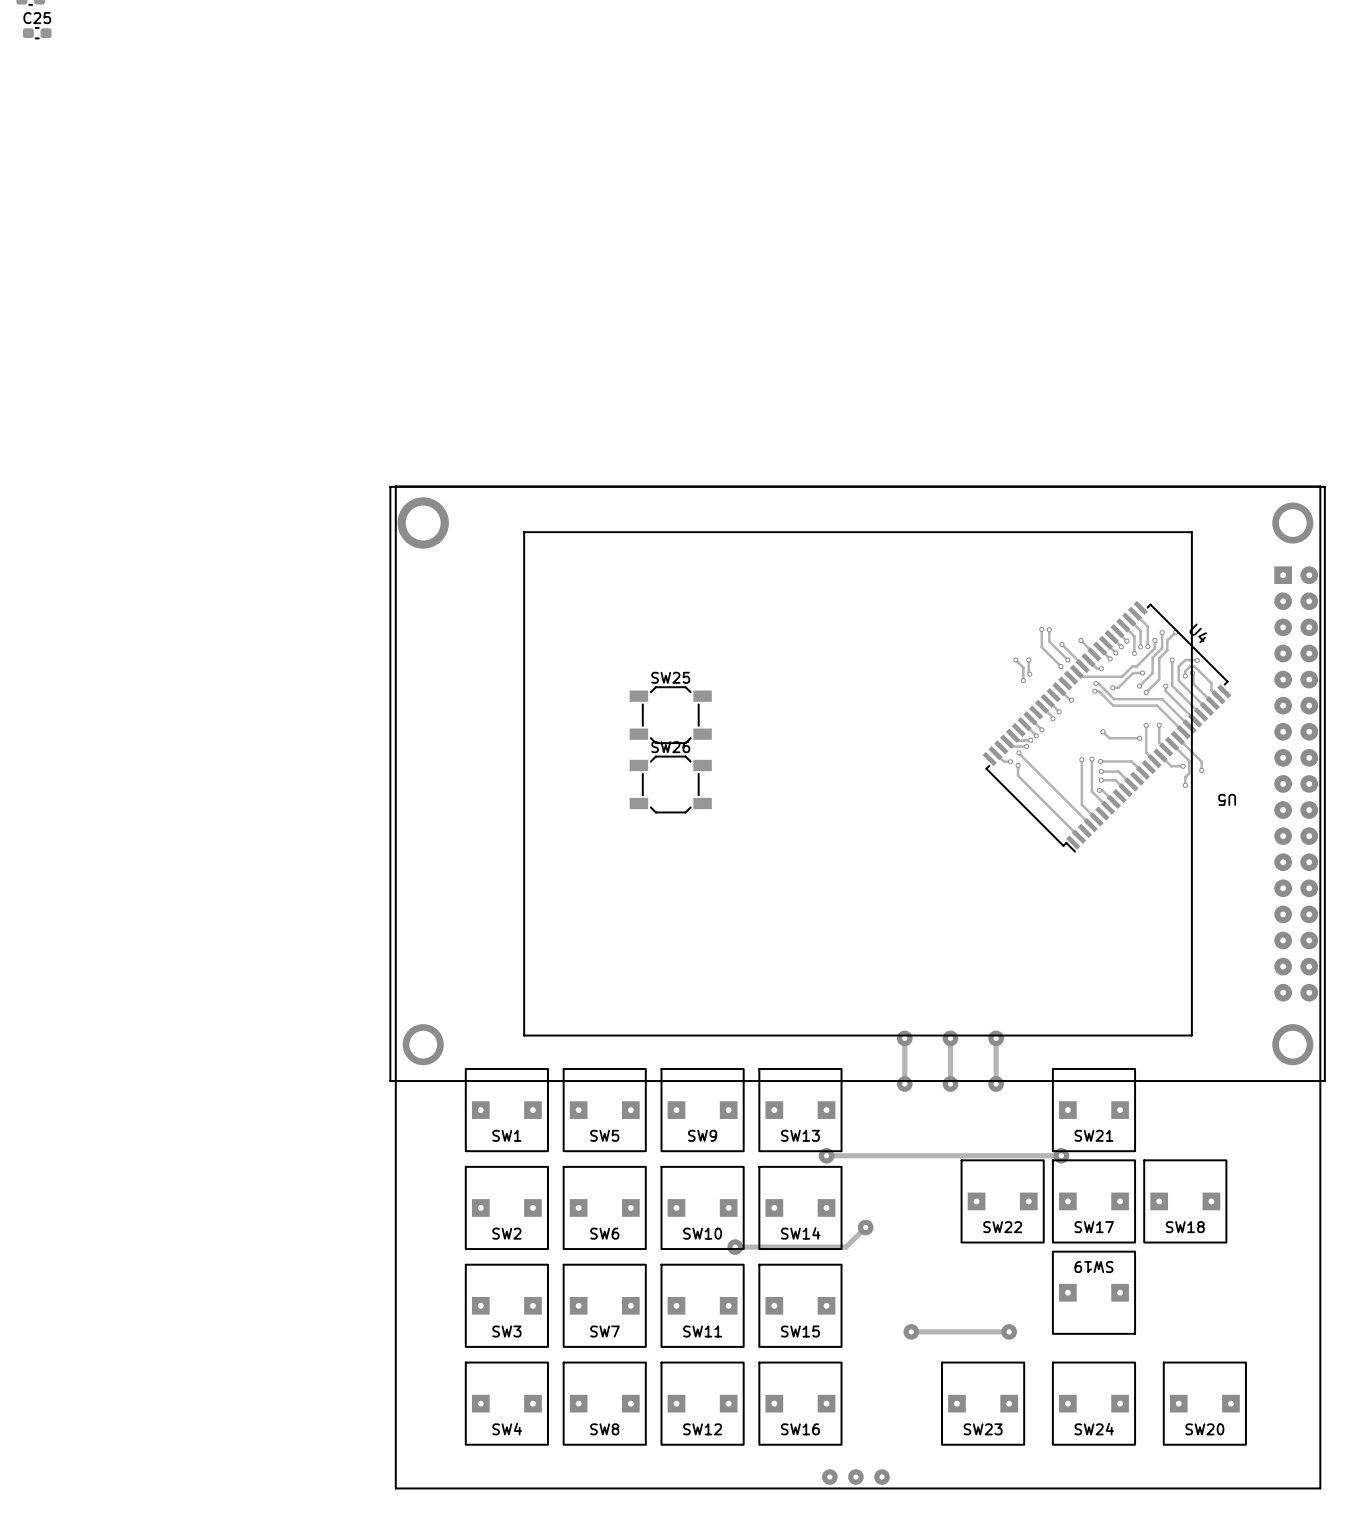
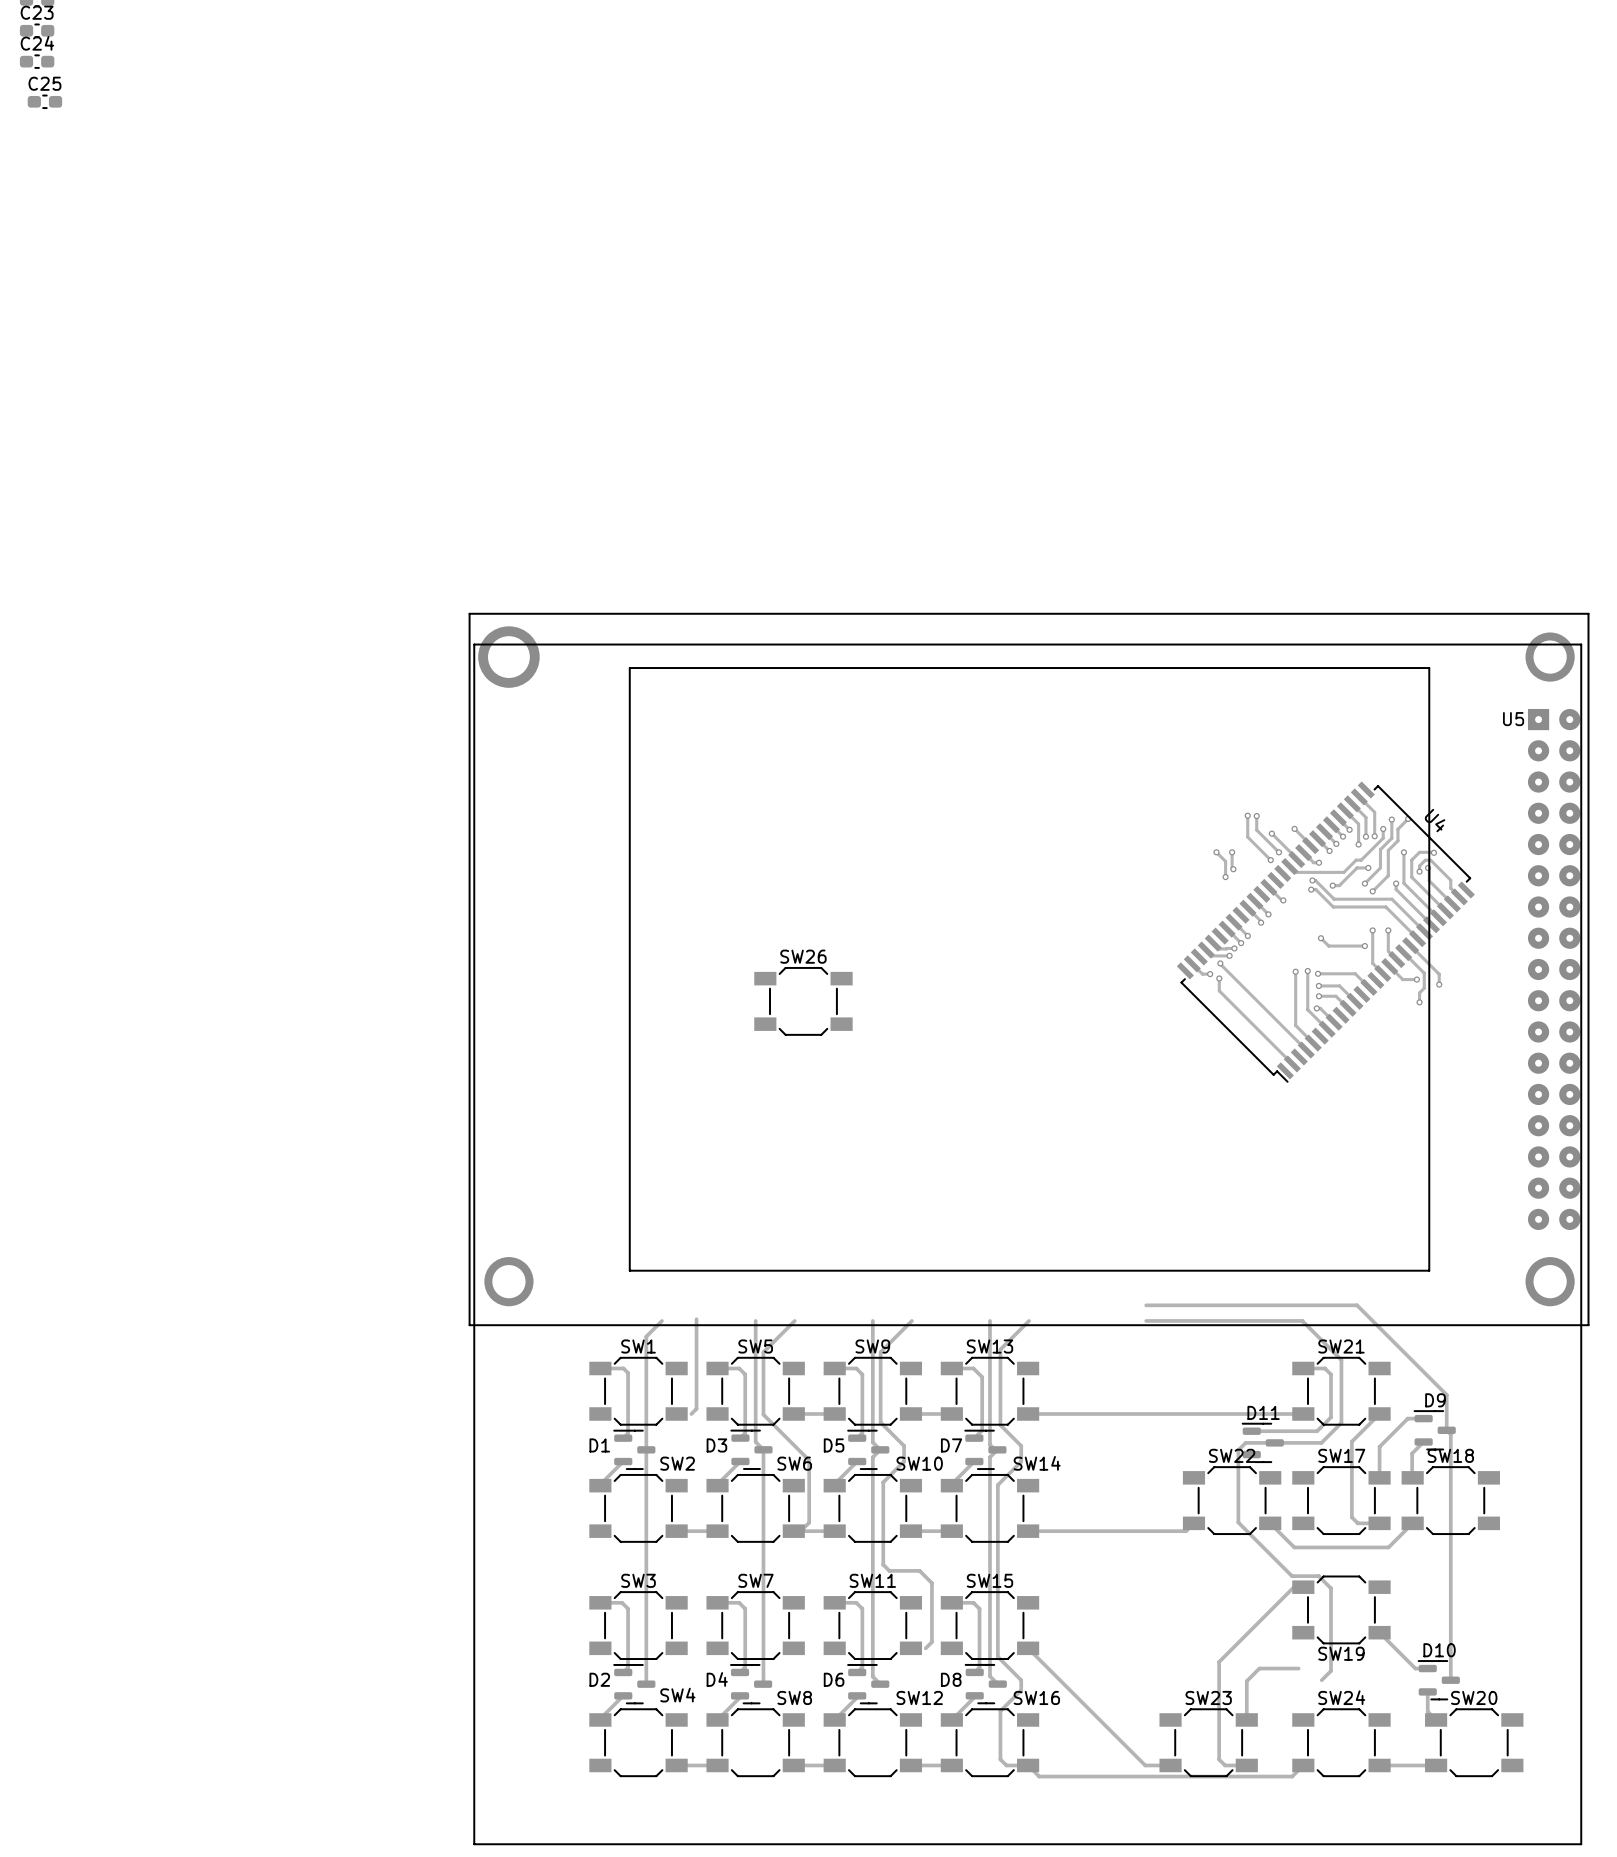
SW25: (670, 715) -> none
U5 position: (857, 783) -> (1029, 969)
U5 name rotation: 0° (1227, 799) -> 180° (1513, 719)
U5 name position: U5 (1227, 799) -> U5 (1513, 719)
track: (904, 1038) (904, 1084) -> none
via: (904, 1038) -> none
track: (950, 1038) (950, 1084) -> none
via: (950, 1038) -> none
track: none -> (1146, 1305) (1357, 1305) (1446, 1394) (1446, 1430) (1450, 1434) (1450, 1680)
track: (996, 1038) (996, 1084) -> none
via: (996, 1038) -> none
track: none -> (696, 1319) (696, 1408) (691, 1414)
track: none -> (661, 1320) (646, 1336) (646, 1684)
track: none -> (755, 1320) (755, 1441) (763, 1449) (763, 1684)
track: none -> (794, 1320) (763, 1352) (763, 1414) (809, 1460) (809, 1522) (800, 1531)
track: none -> (872, 1320) (872, 1442) (880, 1449) (872, 1457) (872, 1676) (880, 1684)
track: none -> (911, 1320) (880, 1352) (880, 1422) (904, 1445) (904, 1461) (883, 1482) (883, 1564) (889, 1570) (919, 1570) (931, 1583) (931, 1642) (925, 1648)
track: none -> (989, 1320) (989, 1444) (997, 1449) (989, 1457) (989, 1676) (997, 1684)
track: none -> (1029, 1320) (1000, 1349) (1000, 1425) (1021, 1445) (1021, 1461) (997, 1485) (997, 1656) (1021, 1680) (1021, 1690) (1000, 1711) (1000, 1759) (1006, 1765) (1028, 1765) (1039, 1776) (1292, 1776) (1303, 1765)
track: none -> (1146, 1320) (1302, 1320) (1341, 1360) (1341, 1422) (1321, 1442) (1245, 1442) (1238, 1450) (1238, 1522) (1292, 1576) (1318, 1576) (1331, 1588) (1331, 1670) (1321, 1680)
SW1 footprint: [465, 1068, 549, 1152] -> [589, 1357, 688, 1426]
SW5 footprint: [563, 1068, 647, 1152] -> [706, 1357, 805, 1426]
SW9 footprint: [660, 1068, 745, 1152] -> [823, 1357, 923, 1426]
SW13 footprint: [758, 1068, 843, 1152] -> [940, 1357, 1040, 1426]
SW21 footprint: [1052, 1068, 1136, 1152] -> [1292, 1357, 1391, 1426]
via: (904, 1084) -> none
via: (950, 1084) -> none
via: (996, 1084) -> none
track: none -> (600, 1368) (623, 1368) (628, 1372) (628, 1433) (623, 1438)
track: none -> (717, 1368) (739, 1368) (745, 1374) (745, 1433) (740, 1438)
track: none -> (834, 1368) (856, 1368) (862, 1374) (862, 1433) (857, 1438)
track: none -> (951, 1368) (973, 1368) (982, 1377) (982, 1430) (974, 1438)
track: none -> (1303, 1368) (1325, 1368) (1331, 1374) (1331, 1417) (1317, 1431) (1251, 1431)
track: none -> (793, 1414) (834, 1414)
track: none -> (910, 1414) (951, 1414)
track: none -> (1028, 1414) (1303, 1414)
track: none -> (1379, 1414) (1351, 1441) (1351, 1517) (1357, 1523) (1379, 1523)
track: none -> (1423, 1418) (1407, 1418) (1379, 1446) (1379, 1477)
SW1 name position: SW1 (506, 1135) -> SW1 (638, 1346)
SW5 name position: SW5 (604, 1135) -> SW5 (755, 1346)
SW9 name position: SW9 (702, 1135) -> SW9 (872, 1346)
SW13 name position: SW13 (800, 1135) -> SW13 (989, 1346)
SW21 name position: SW21 (1093, 1135) -> SW21 (1341, 1346)
D9: none -> (1434, 1430)
track: none -> (1423, 1441) (1412, 1453) (1412, 1477)
D11: none -> (1262, 1442)
track: (826, 1155) (1061, 1155) -> none
via: (826, 1155) -> none
via: (1061, 1155) -> none
D1: none -> (634, 1449)
D3: none -> (751, 1449)
D5: none -> (868, 1449)
D7: none -> (985, 1449)
SW22 footprint: [960, 1159, 1045, 1244] -> [1182, 1466, 1282, 1535]
SW17 footprint: [1052, 1159, 1136, 1244] -> [1292, 1466, 1391, 1535]
SW18 footprint: [1143, 1159, 1228, 1244] -> [1401, 1466, 1501, 1535]
SW2 footprint: [465, 1166, 549, 1250] -> [589, 1474, 688, 1543]
SW6 footprint: [563, 1166, 647, 1250] -> [706, 1474, 805, 1543]
SW10 footprint: [660, 1166, 745, 1250] -> [823, 1474, 923, 1543]
SW14 footprint: [758, 1166, 843, 1250] -> [940, 1474, 1040, 1543]
track: none -> (623, 1461) (600, 1485)
track: none -> (740, 1461) (717, 1485)
track: none -> (857, 1461) (834, 1485)
track: none -> (974, 1461) (951, 1485)
track: none -> (1193, 1523) (1186, 1531) (1028, 1531)
track: none -> (1270, 1523) (1294, 1547) (1388, 1547) (1412, 1523)
track: none -> (676, 1531) (717, 1531)
track: none -> (793, 1531) (834, 1531)
track: none -> (910, 1531) (951, 1531)
track: (865, 1227) (846, 1247) (735, 1247) -> none
via: (865, 1227) -> none
SW22 name position: SW22 (1002, 1227) -> SW22 (1232, 1455)
SW17 name position: SW17 (1094, 1227) -> SW17 (1341, 1455)
SW18 name position: SW18 (1185, 1227) -> SW18 (1450, 1455)
SW2 name position: SW2 (506, 1233) -> SW2 (677, 1463)
SW6 name position: SW6 (604, 1233) -> SW6 (794, 1463)
SW10 name position: SW10 (702, 1233) -> SW10 (919, 1463)
SW14 name position: SW14 (800, 1233) -> SW14 (1037, 1463)
via: (735, 1247) -> none
SW19 footprint: [1052, 1251, 1136, 1335] -> [1292, 1575, 1391, 1645]
SW3 footprint: [465, 1264, 549, 1348] -> [589, 1591, 688, 1660]
SW7 footprint: [563, 1264, 647, 1348] -> [706, 1591, 805, 1660]
SW11 footprint: [660, 1264, 745, 1348] -> [823, 1591, 923, 1660]
SW15 footprint: [758, 1264, 843, 1348] -> [940, 1591, 1040, 1660]
SW19 name position: SW19 (1093, 1267) -> SW19 (1341, 1653)
track: none -> (1303, 1587) (1293, 1587) (1219, 1661) (1219, 1759) (1225, 1765) (1246, 1765)
track: none -> (600, 1602) (622, 1602) (628, 1608) (628, 1667) (623, 1672)
track: none -> (717, 1602) (739, 1602) (745, 1608) (745, 1667) (740, 1672)
track: none -> (834, 1602) (856, 1602) (862, 1608) (862, 1667) (857, 1672)
track: none -> (951, 1602) (973, 1602) (979, 1608) (979, 1667) (974, 1672)
track: none -> (1379, 1632) (1415, 1668) (1427, 1668)
track: none -> (1028, 1648) (1145, 1765) (1170, 1765)
SW3 name position: SW3 (506, 1331) -> SW3 (638, 1580)
SW7 name position: SW7 (604, 1331) -> SW7 (755, 1580)
SW11 name position: SW11 (702, 1331) -> SW11 (872, 1580)
SW15 name position: SW15 (800, 1331) -> SW15 (989, 1580)
track: (911, 1331) (1009, 1331) -> none
via: (911, 1331) -> none
via: (1009, 1331) -> none
track: none -> (1298, 1668) (1259, 1668) (1246, 1681) (1246, 1719)
D10: none -> (1438, 1680)
D2: none -> (634, 1684)
D4: none -> (751, 1684)
D6: none -> (868, 1684)
D8: none -> (985, 1684)
SW4 footprint: [465, 1361, 549, 1446] -> [589, 1708, 688, 1777]
SW8 footprint: [563, 1361, 647, 1446] -> [706, 1708, 805, 1777]
SW12 footprint: [660, 1361, 745, 1446] -> [823, 1708, 923, 1777]
SW16 footprint: [758, 1361, 843, 1446] -> [940, 1708, 1040, 1777]
SW23 footprint: [941, 1361, 1025, 1446] -> [1159, 1708, 1258, 1777]
SW24 footprint: [1052, 1361, 1136, 1446] -> [1292, 1708, 1391, 1777]
SW20 footprint: [1163, 1361, 1247, 1446] -> [1425, 1708, 1524, 1777]
track: none -> (1427, 1691) (1427, 1711) (1436, 1719)
track: none -> (623, 1695) (600, 1719)
track: none -> (740, 1695) (717, 1719)
track: none -> (857, 1695) (834, 1719)
track: none -> (974, 1695) (951, 1719)
track: none -> (676, 1765) (717, 1765)
track: none -> (793, 1765) (834, 1765)
track: none -> (910, 1765) (951, 1765)
track: none -> (1379, 1765) (1436, 1765)
SW4 name position: SW4 (507, 1429) -> SW4 (677, 1695)
SW8 name position: SW8 (604, 1429) -> SW8 (794, 1697)
SW12 name position: SW12 (702, 1429) -> SW12 (919, 1697)
SW16 name position: SW16 (800, 1429) -> SW16 (1036, 1697)
SW23 name position: SW23 (983, 1429) -> SW23 (1208, 1697)
SW24 name position: SW24 (1094, 1429) -> SW24 (1341, 1697)
SW20 name position: SW20 (1204, 1429) -> SW20 (1474, 1697)
via: (829, 1477) -> none
via: (855, 1477) -> none
via: (882, 1477) -> none

